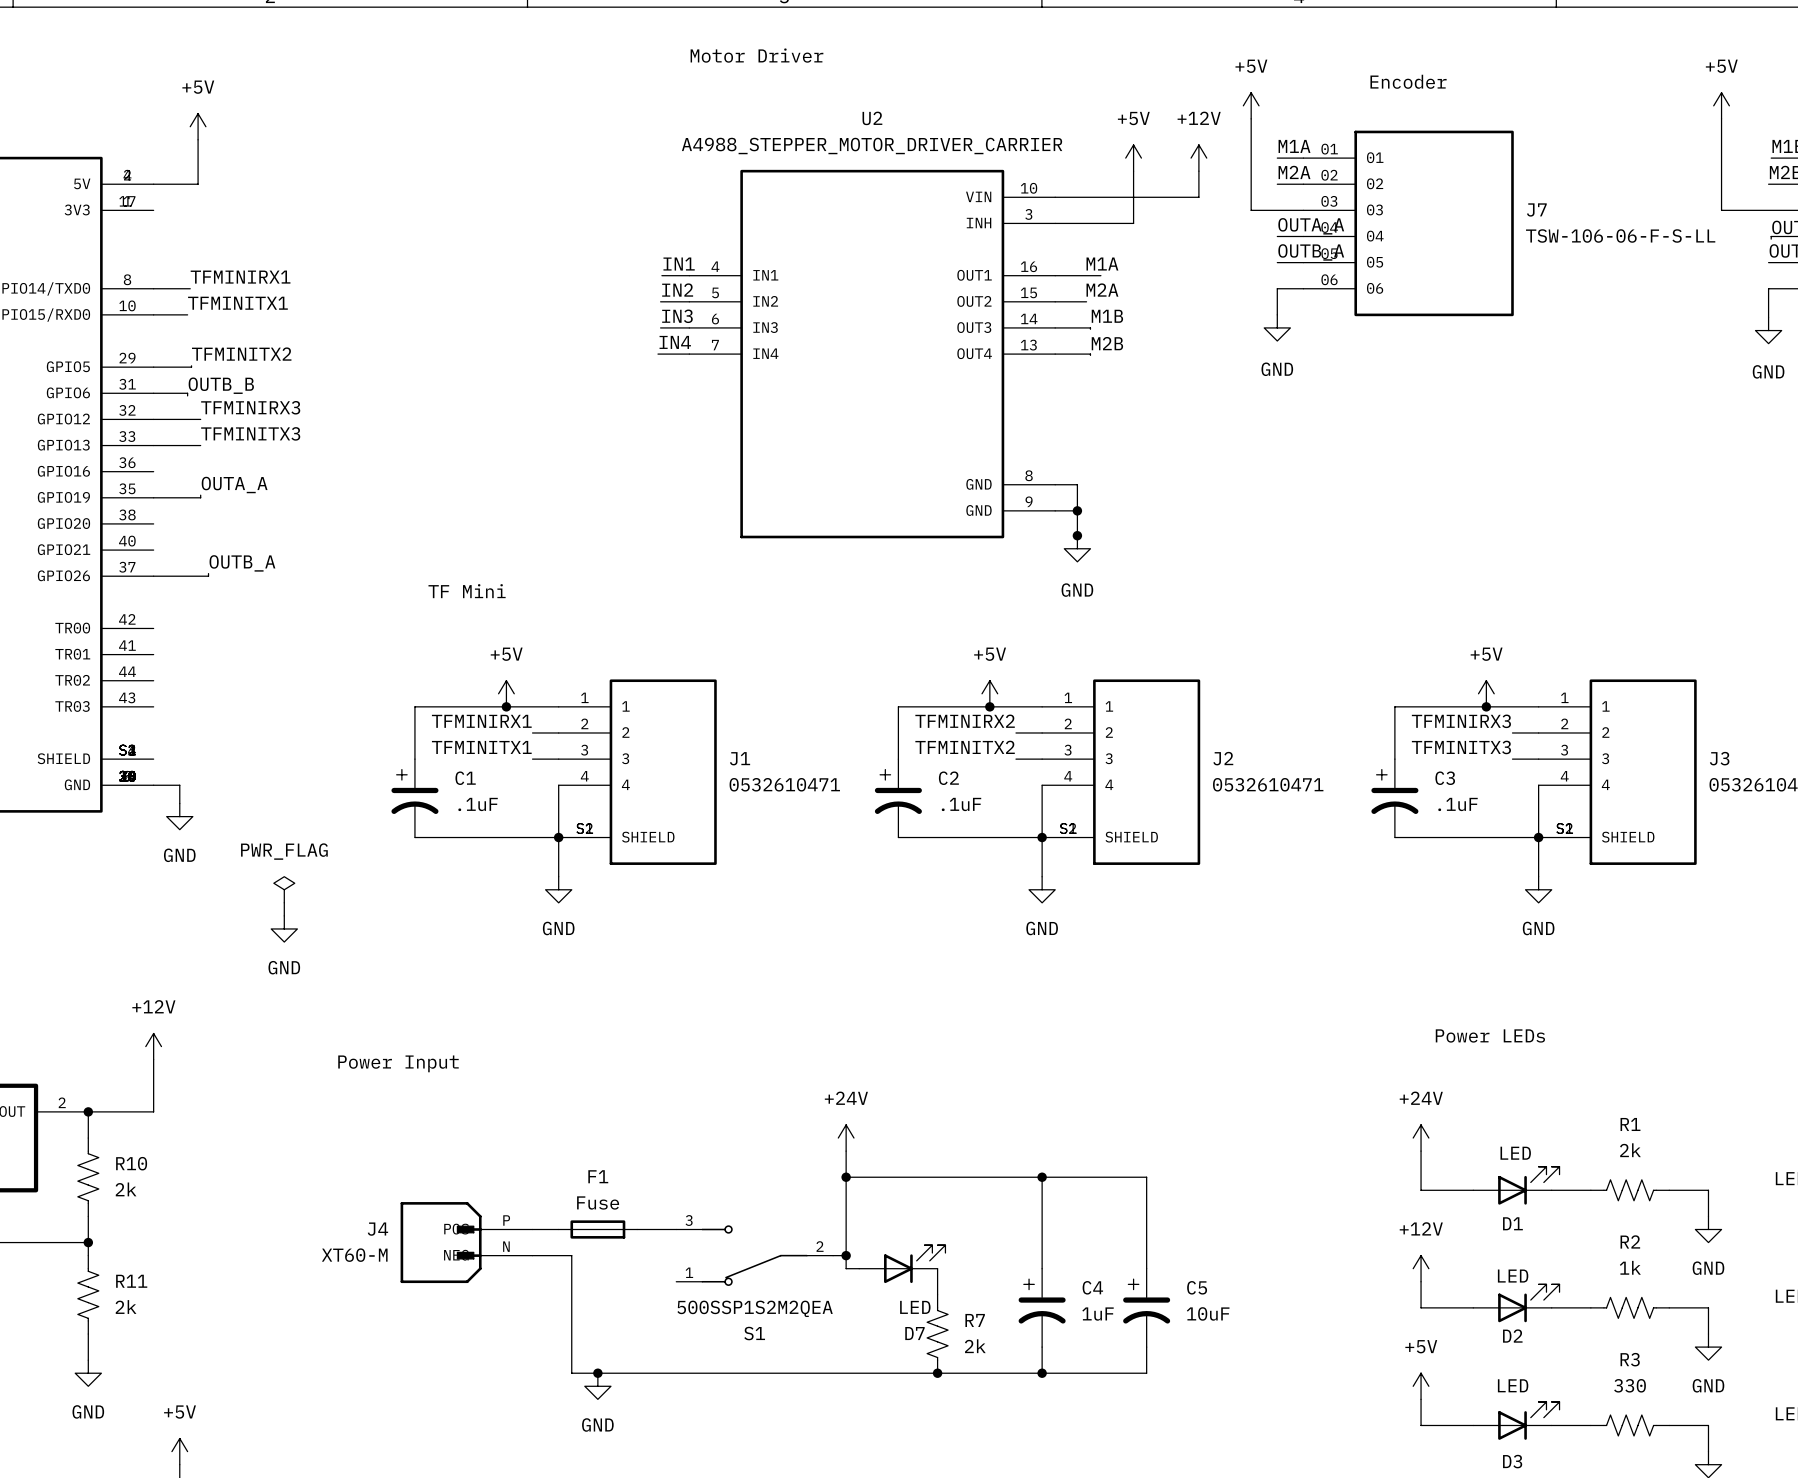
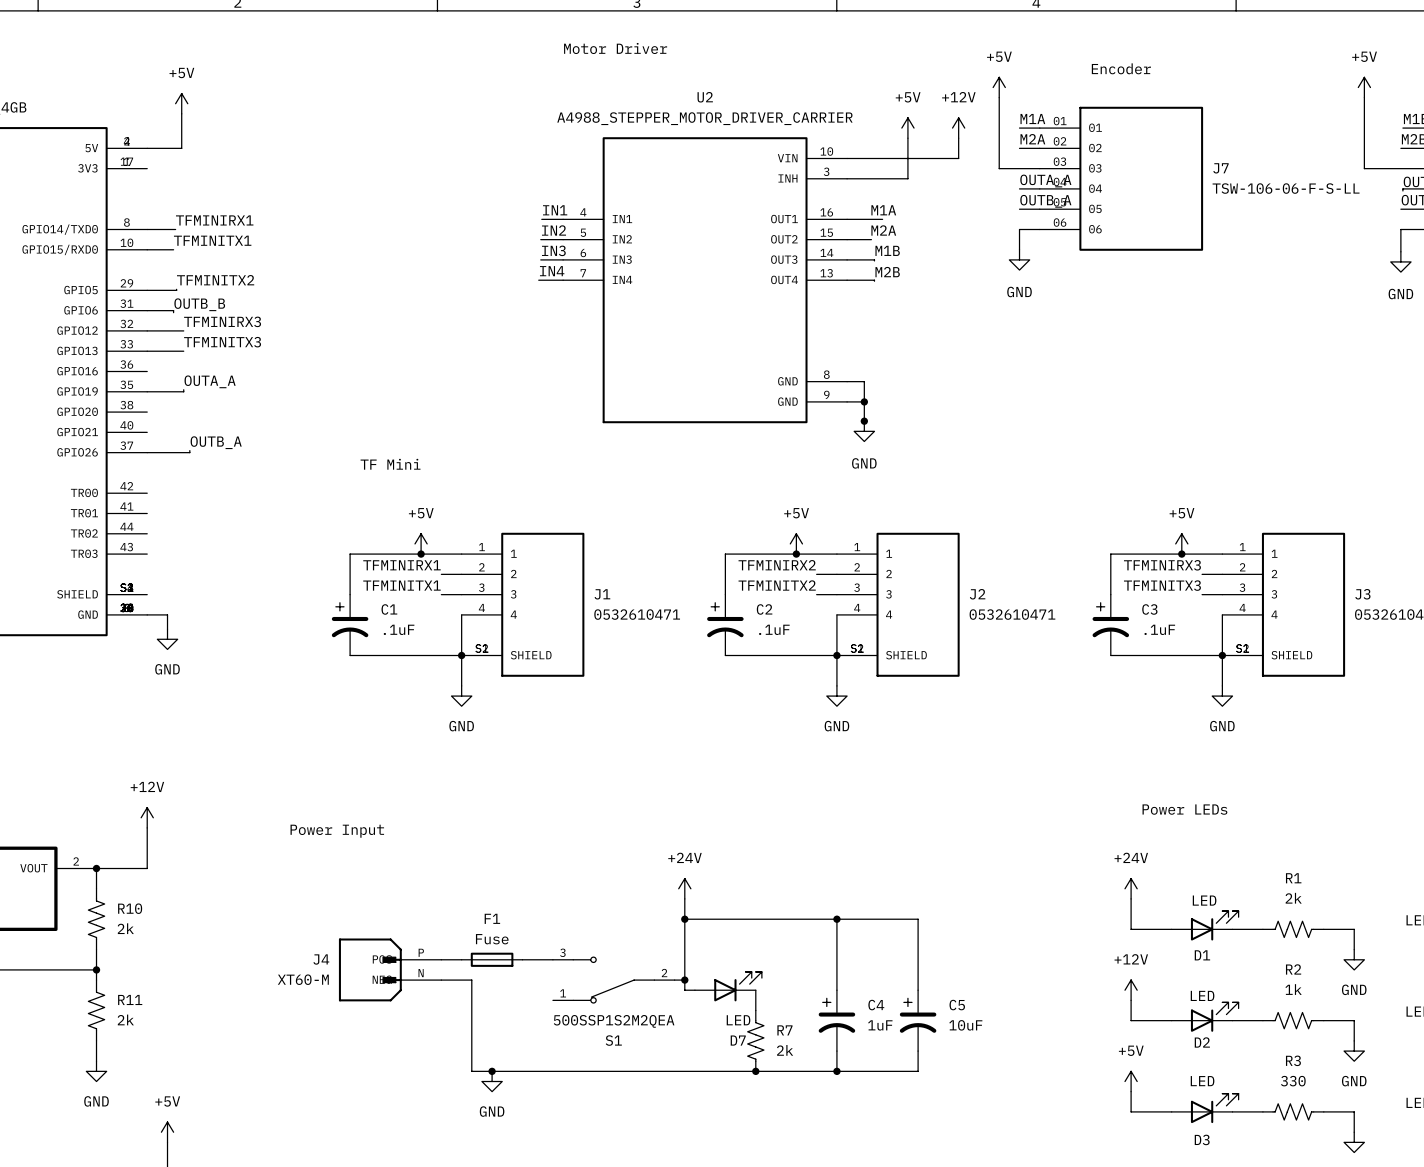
power symbol: PWR_FLAG (284, 889) -> none
wire: (284, 902) (284, 915) -> none
power symbol: GND (284, 928) -> none

